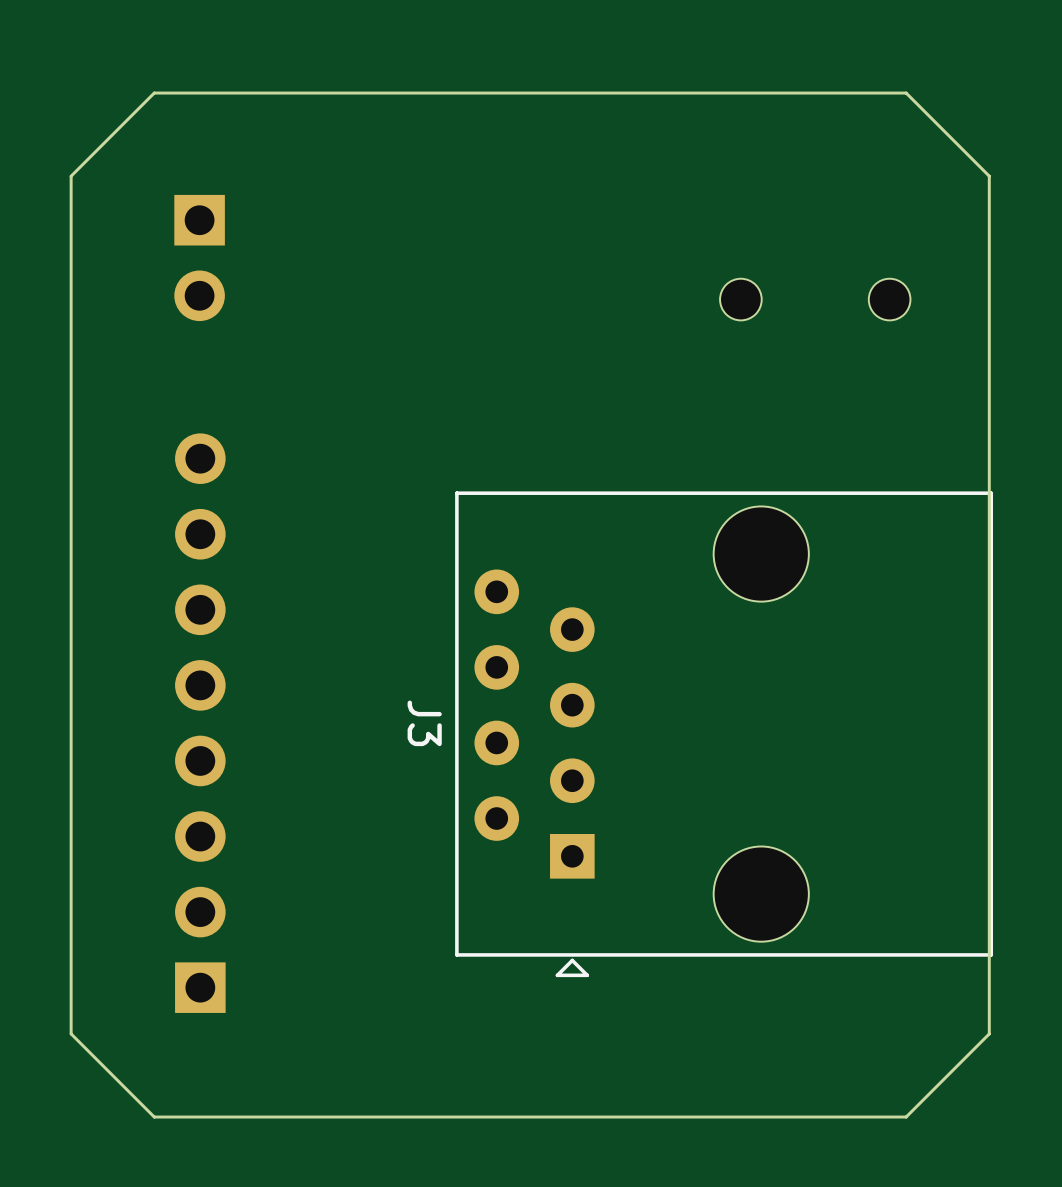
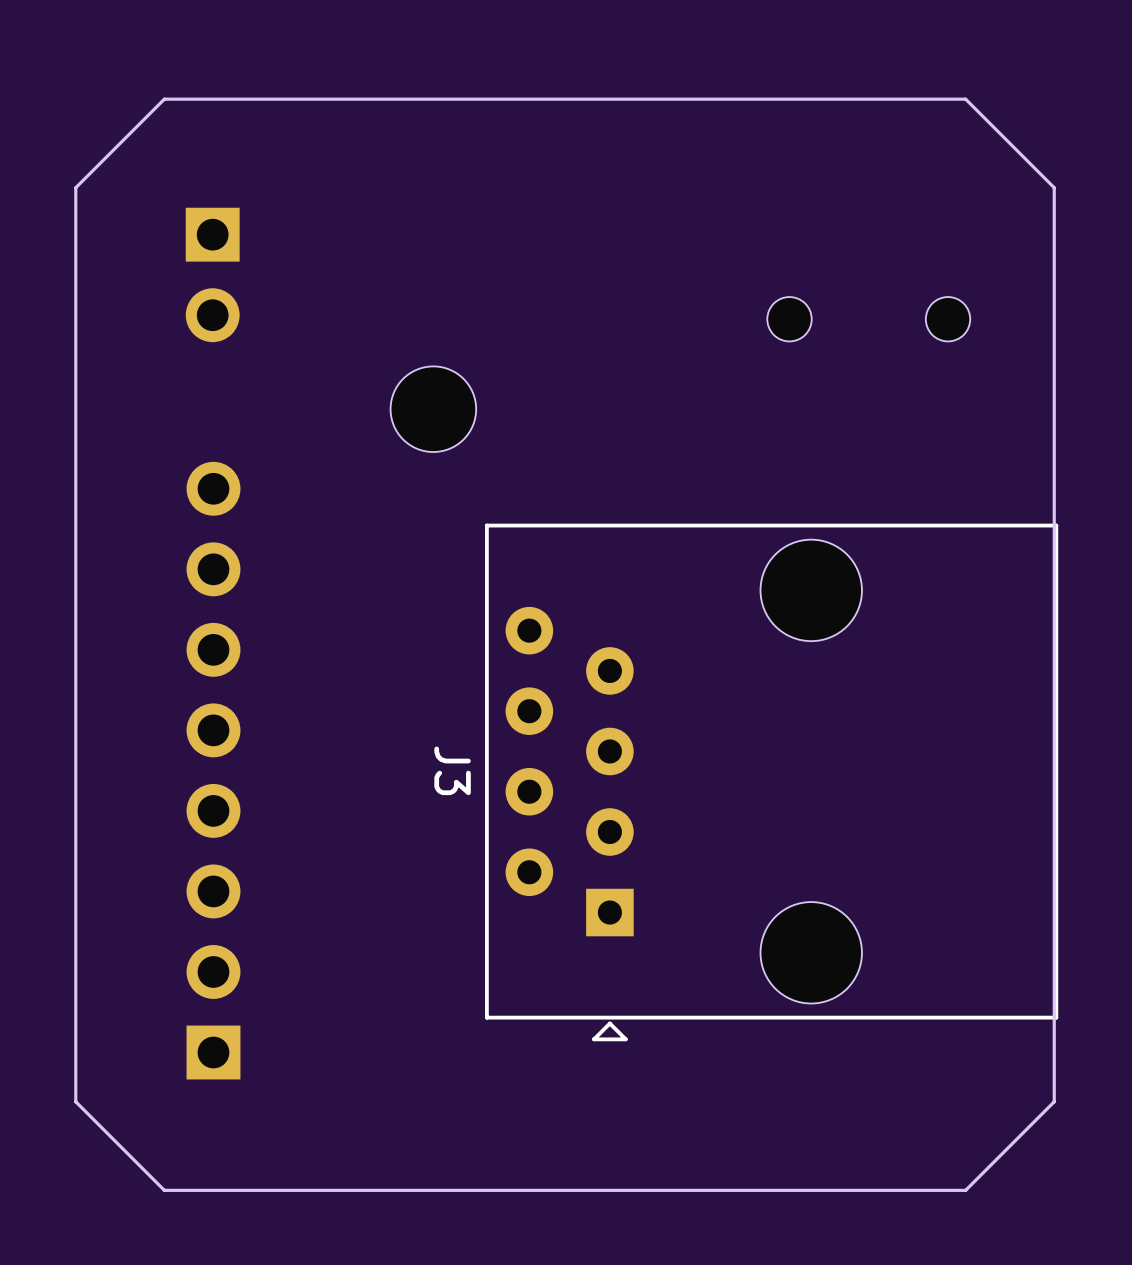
part: none -> (433, 409)

